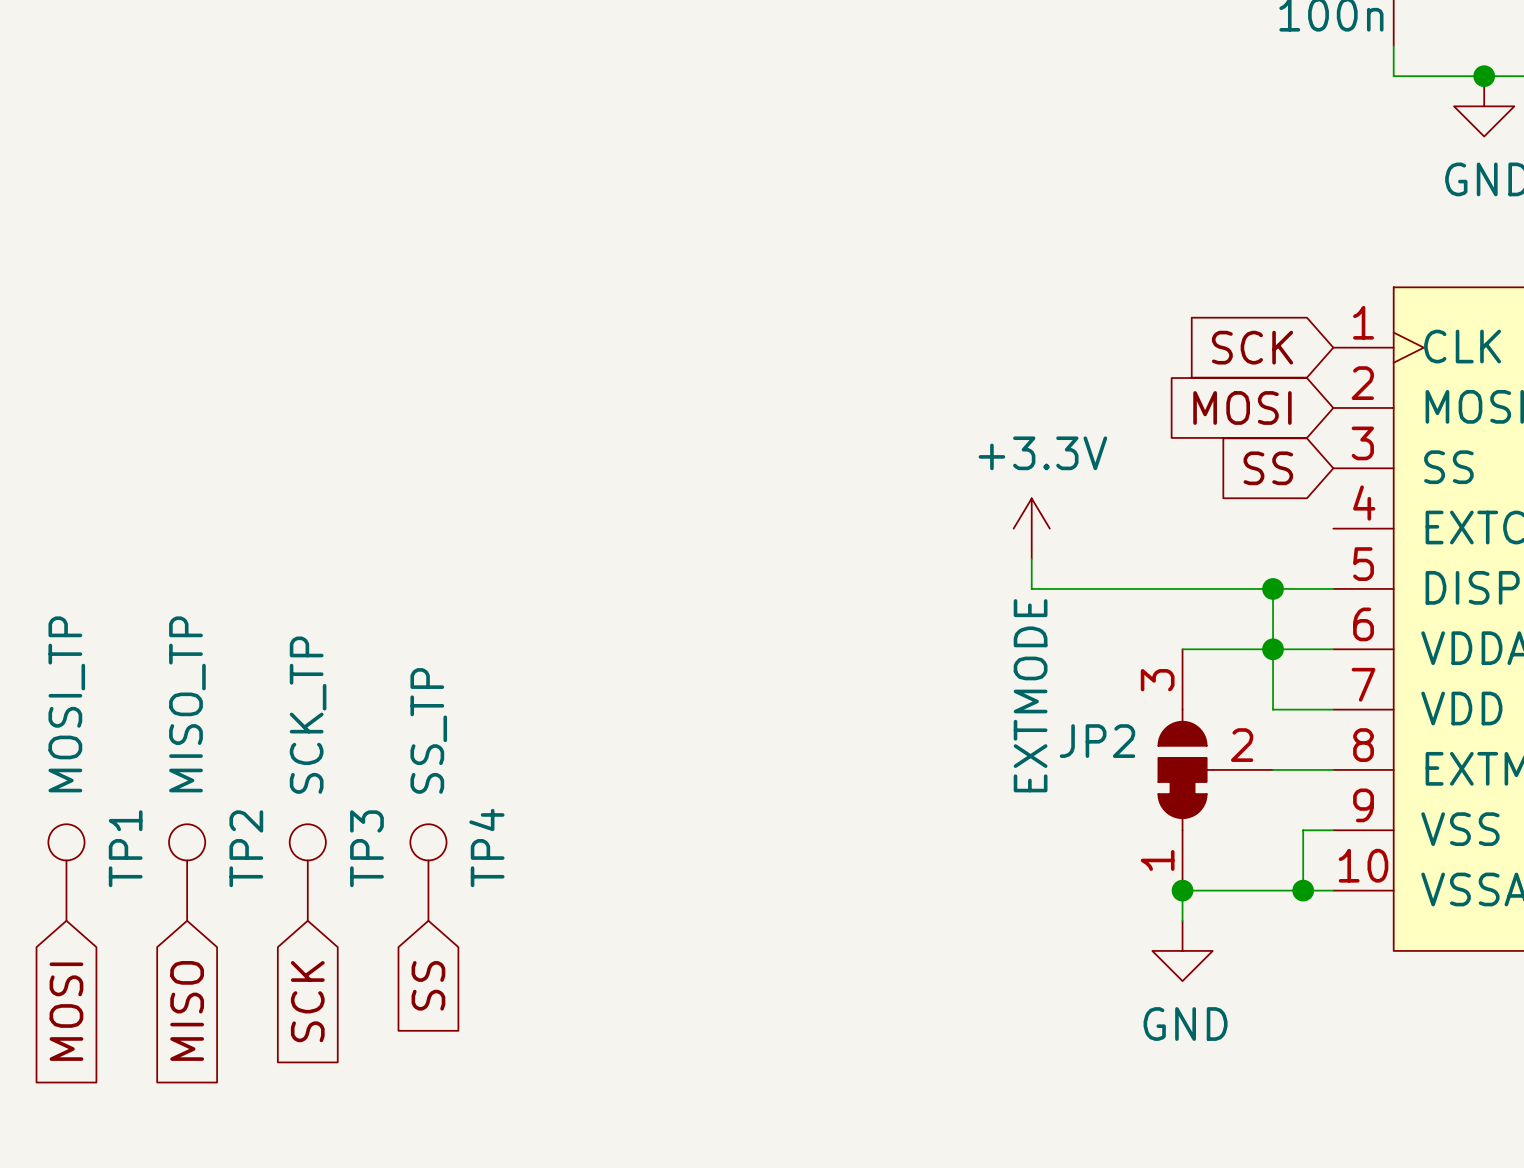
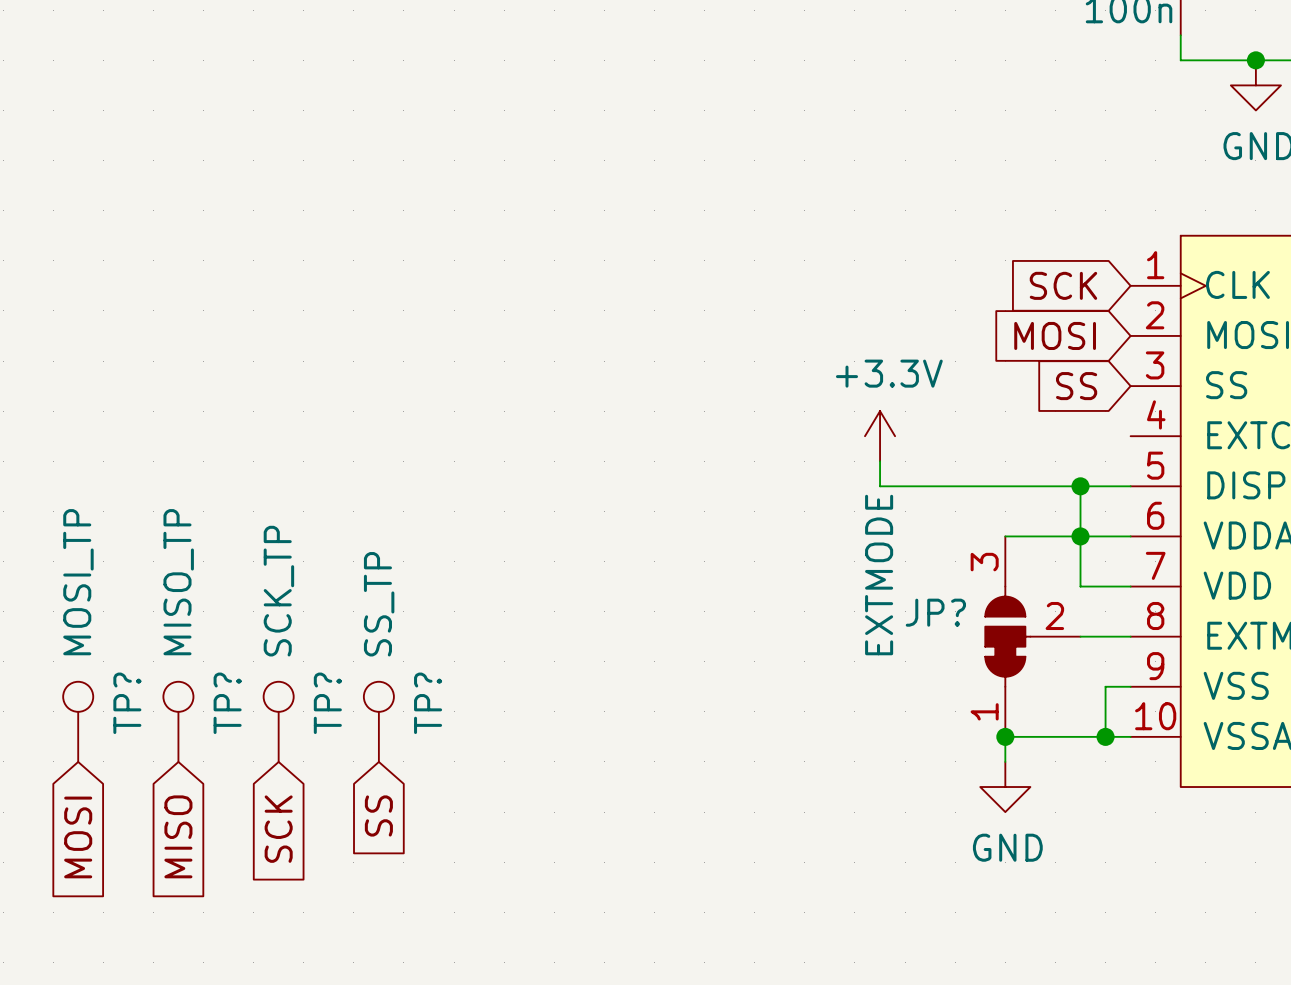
JP2 name: JP2 (1097, 741) -> JP? (935, 612)
TP1 name: TP1 (125, 848) -> TP? (127, 703)
TP2 name: TP2 (246, 848) -> TP? (227, 703)
TP3 name: TP3 (366, 848) -> TP? (327, 703)
TP4 name: TP4 (486, 848) -> TP? (428, 703)

